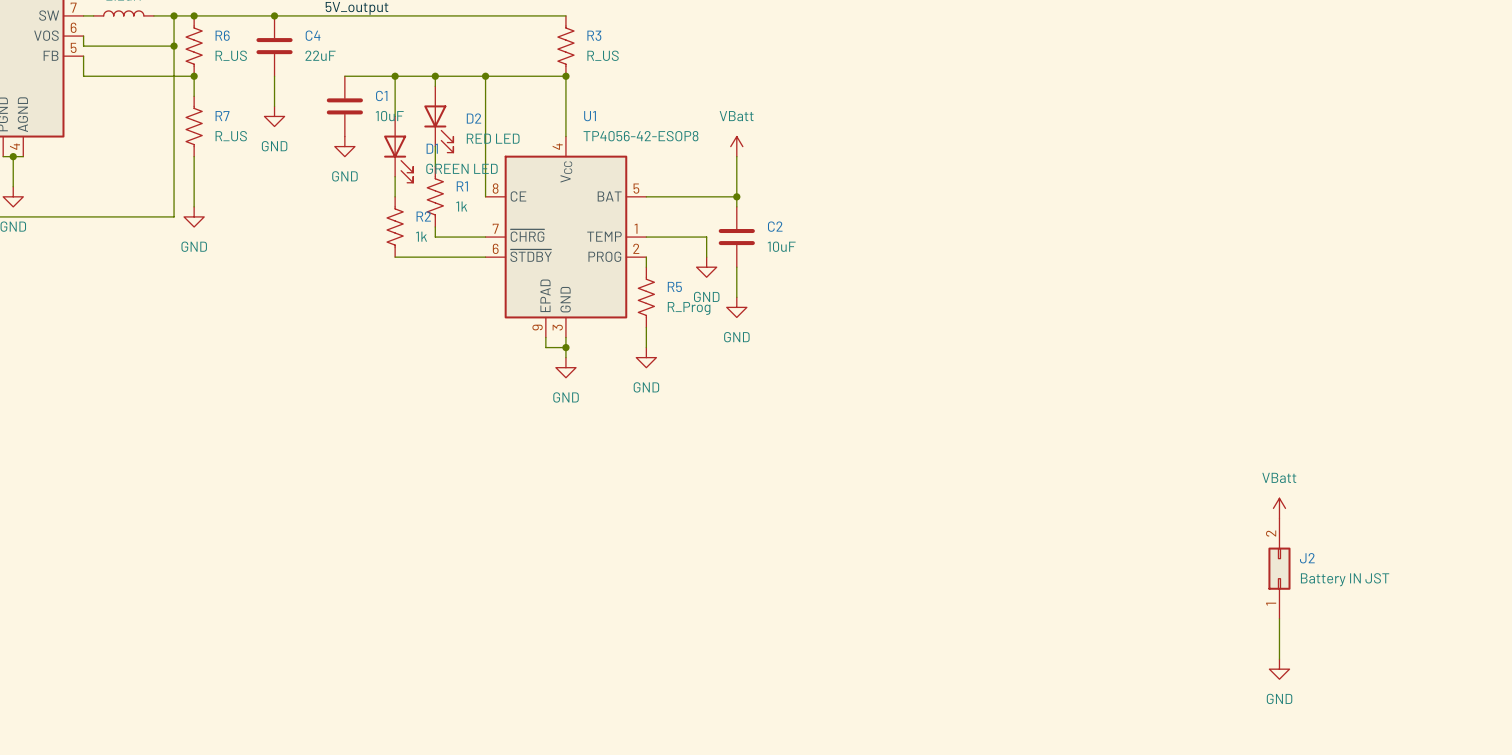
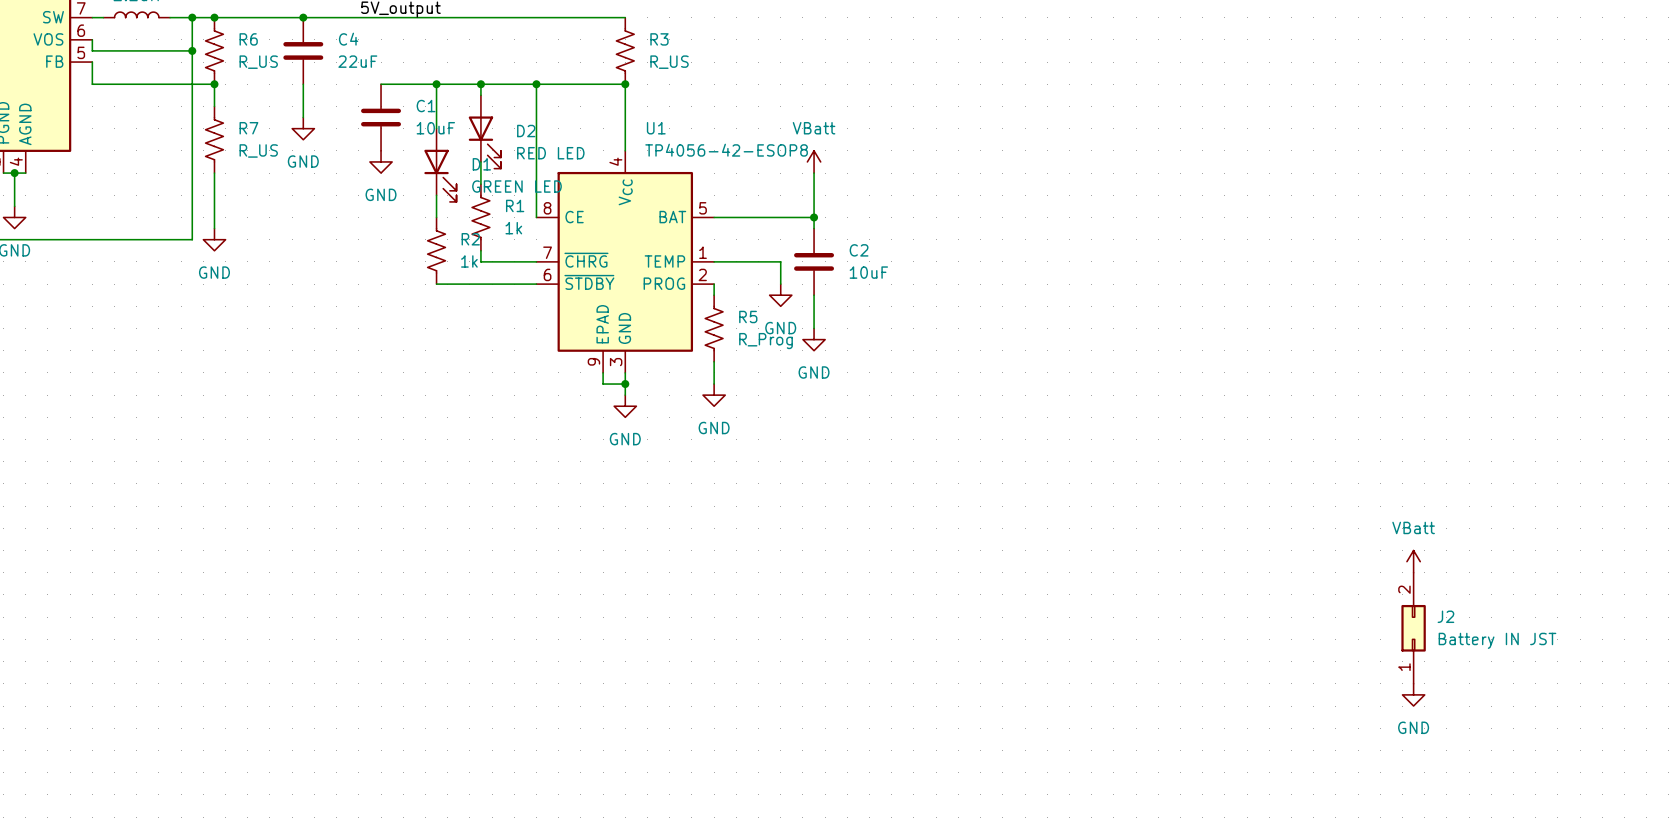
wire: (1279, 618) (1279, 659) -> none
power symbol position: GND (1279, 669) -> GND (1413, 694)

